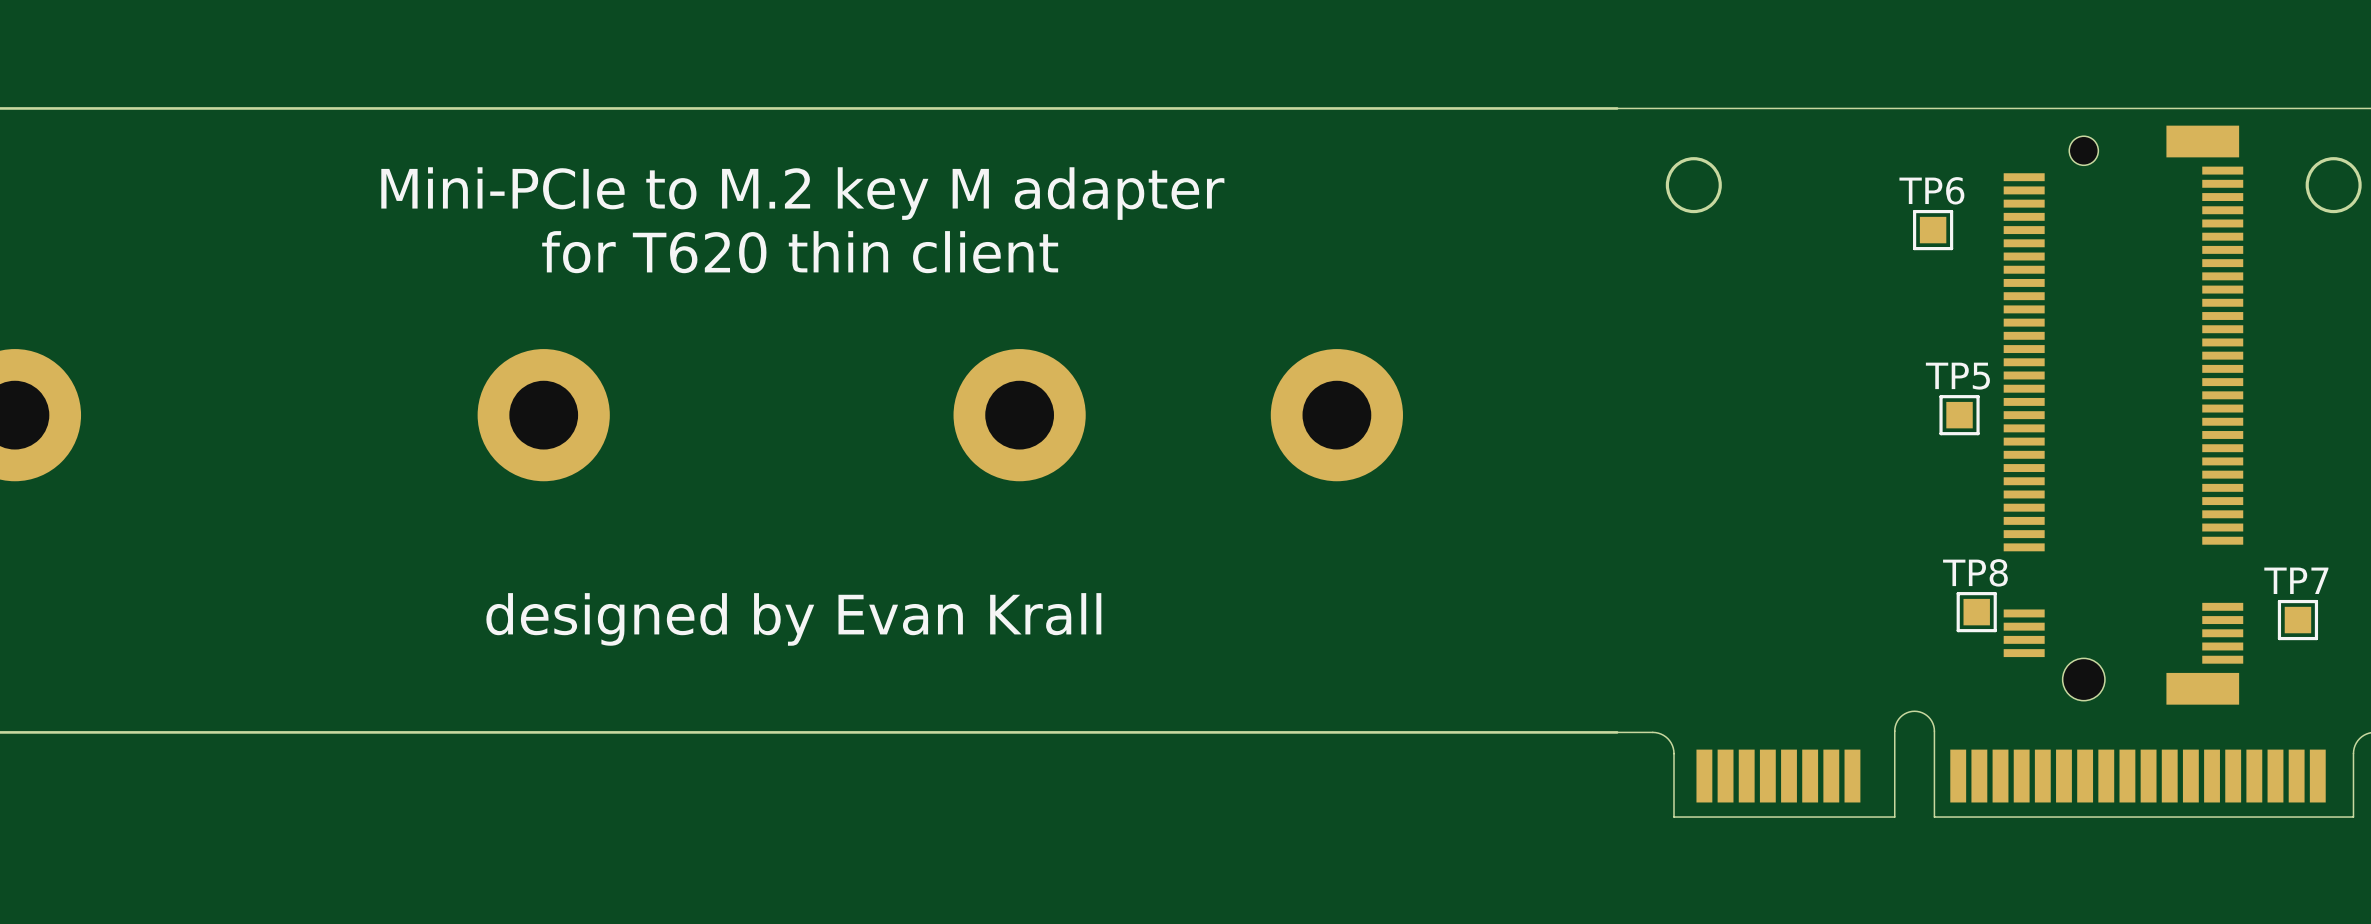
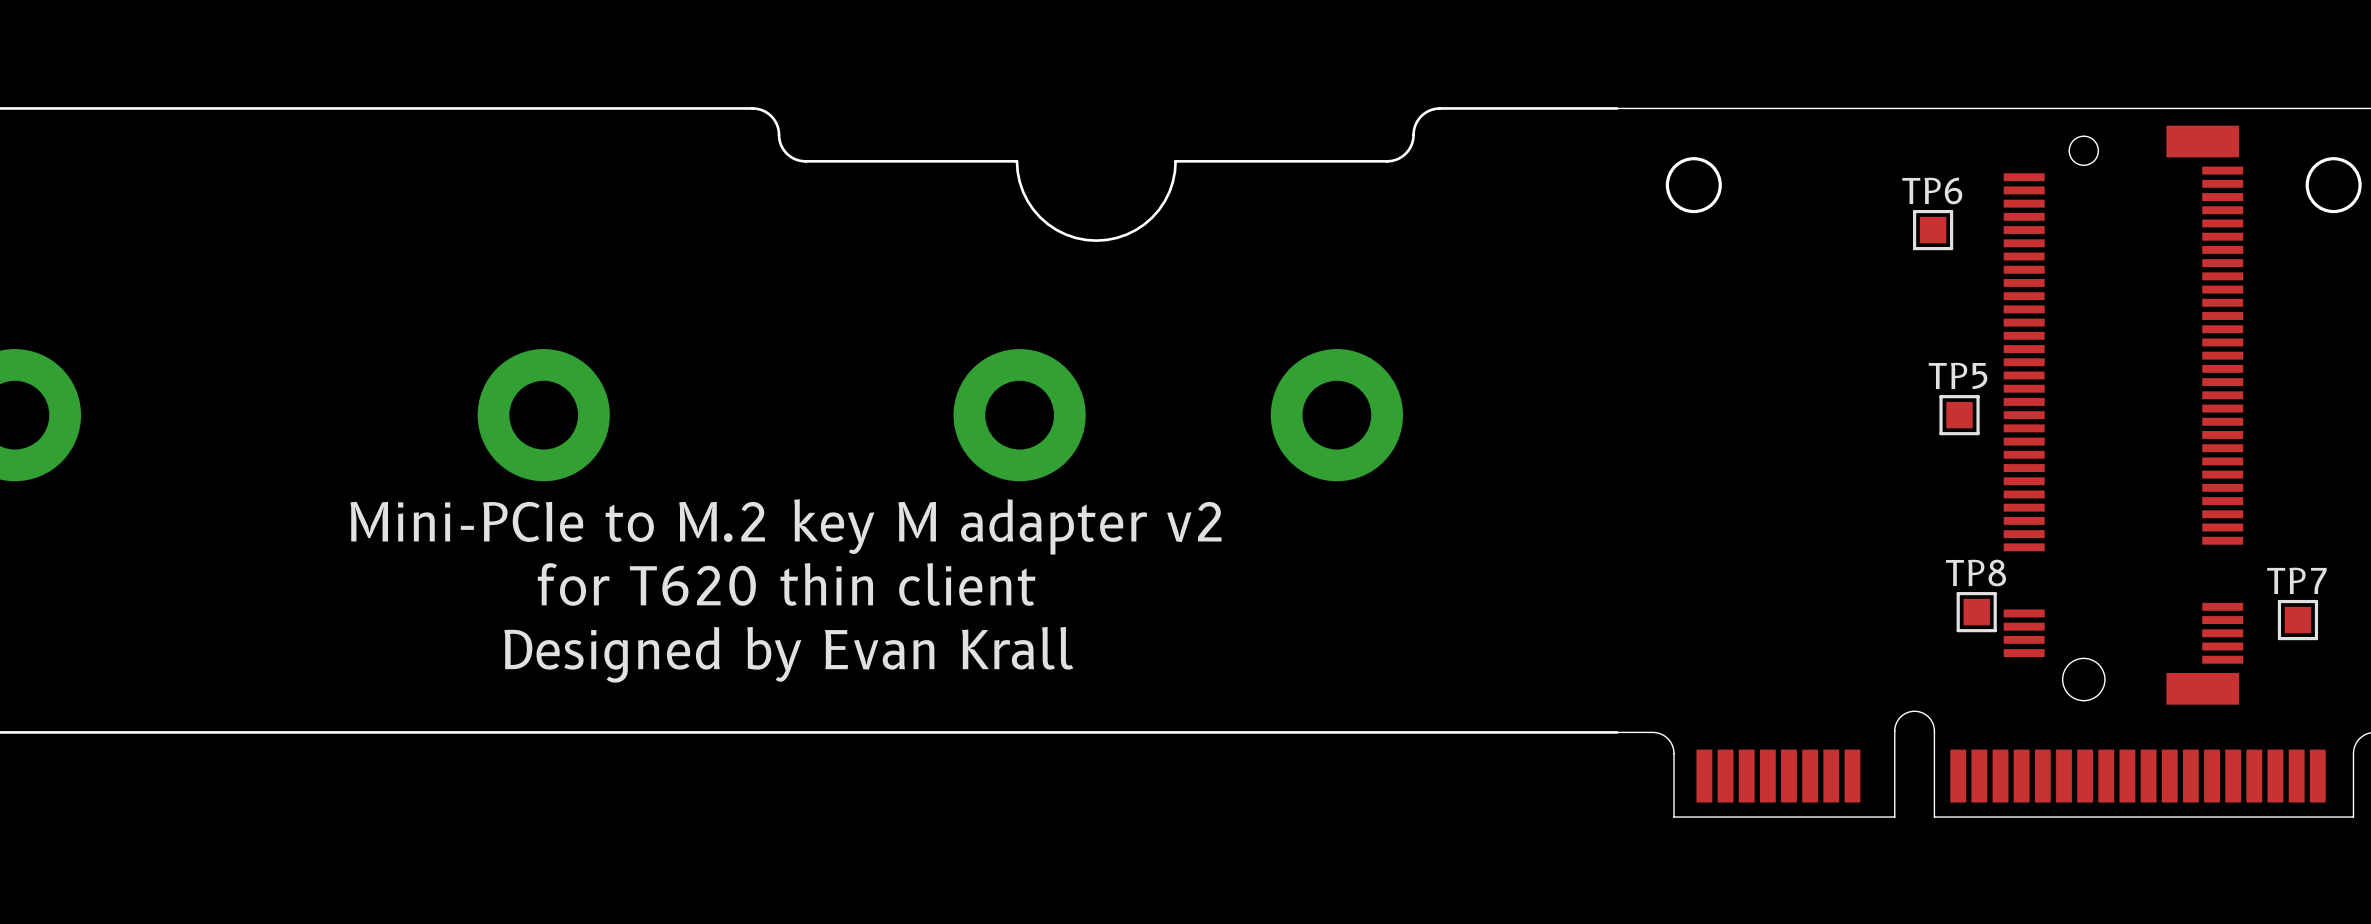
board edge: (752, 108) (1440, 108) -> (752, 108) (764, 111) (771, 116) (777, 126) (783, 148) (791, 157) (799, 160) (1016, 161) (1023, 191) (1040, 217) (1065, 234) (1096, 240) (1126, 234) (1152, 217) (1169, 191) (1175, 161) (1393, 160) (1401, 157) (1409, 148) (1415, 126) (1421, 116) (1428, 111) (1440, 108)
text: Mini-PCIe to M.2 key M adapter (802, 193) -> none
text position: for T620 thin client (800, 252) -> for T620 thin client (786, 584)
text: none -> Mini-PCIe to M.2 key M adapter v2 (786, 526)
text: designed by Evan Krall (793, 619) -> Designed by Evan Krall (788, 654)

